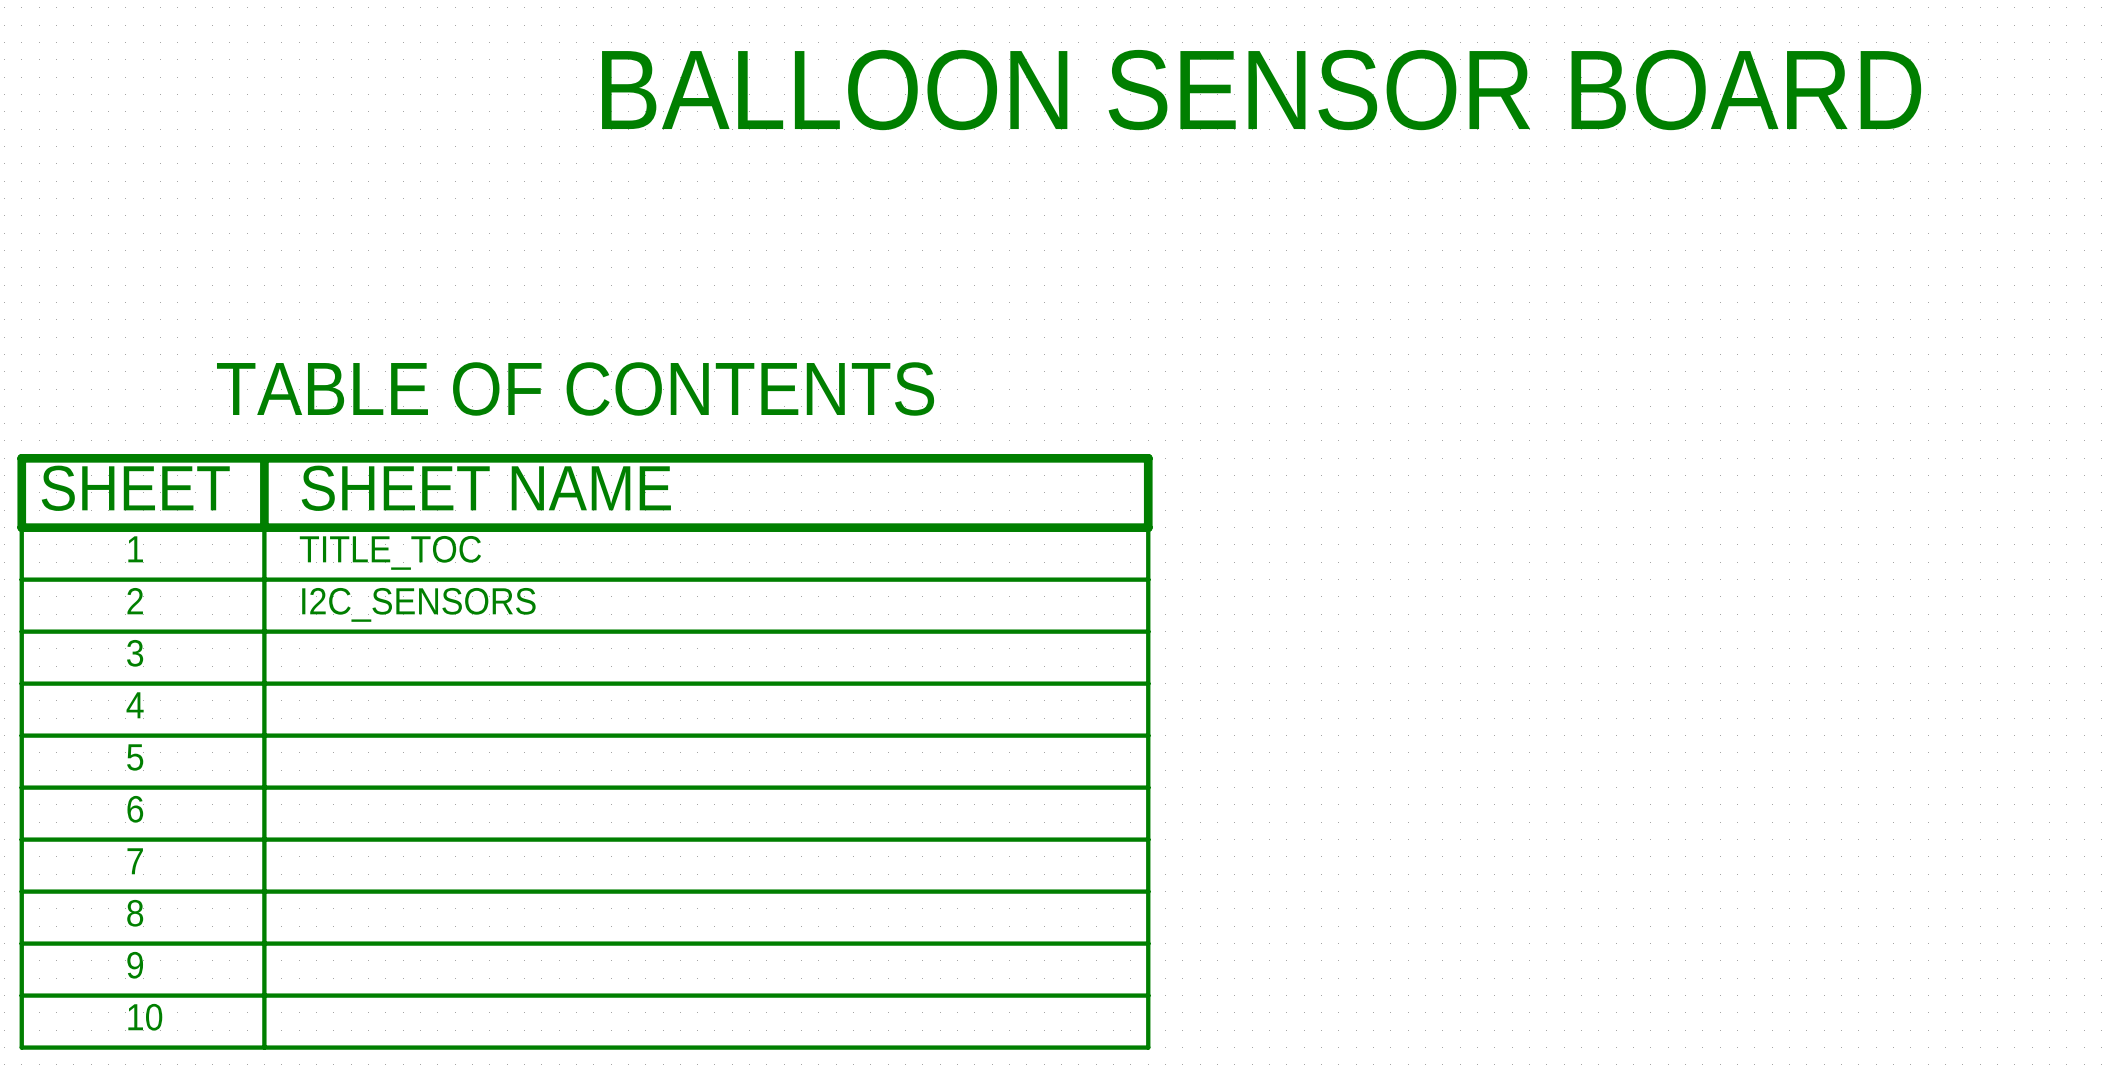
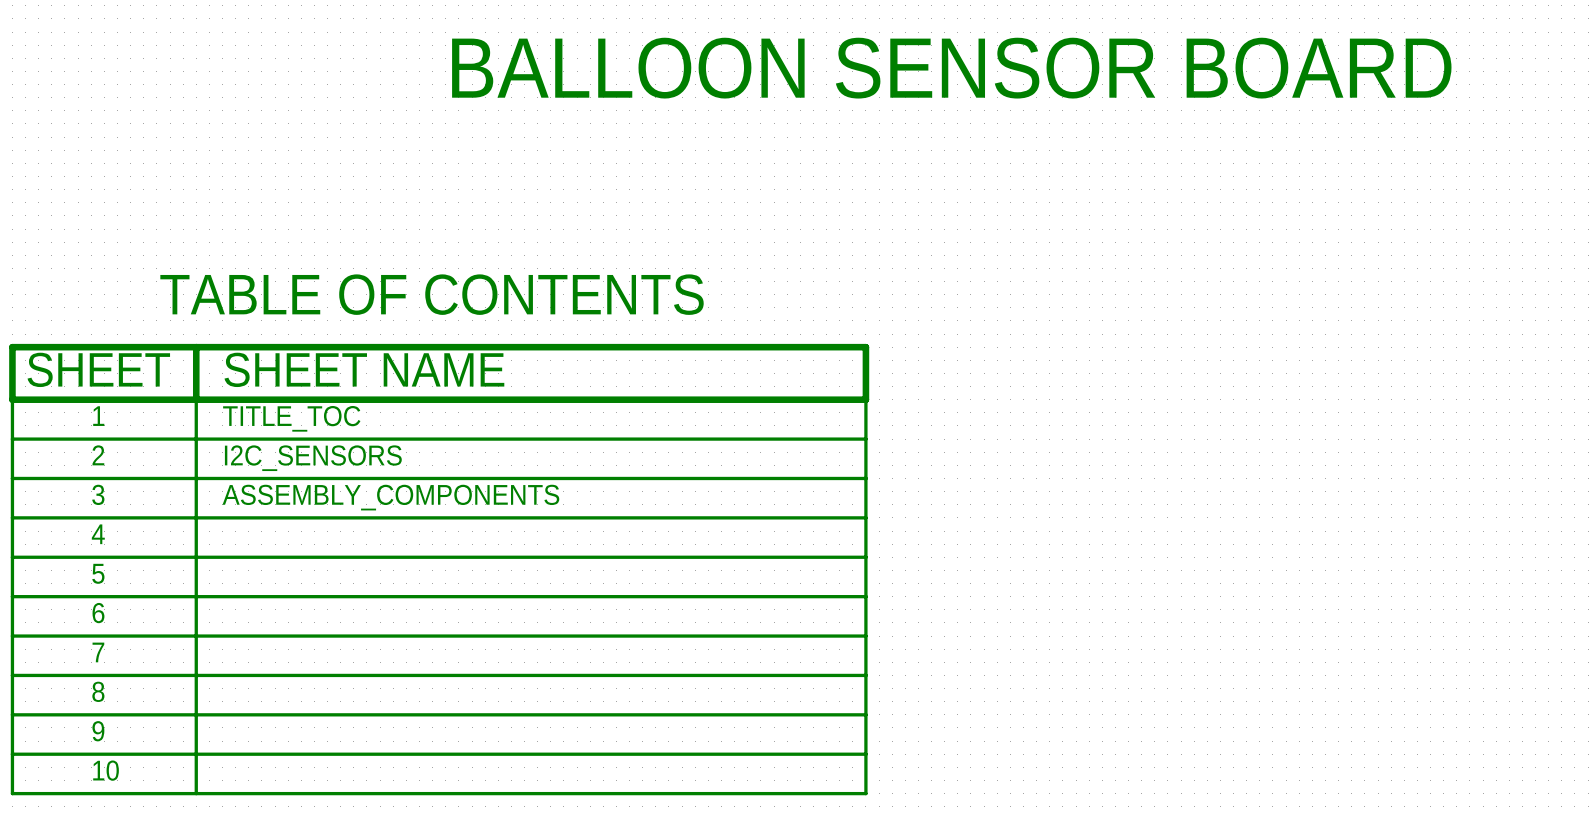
text: none -> ASSEMBLY_COMPONENTS (390, 497)

